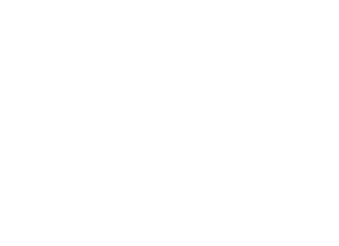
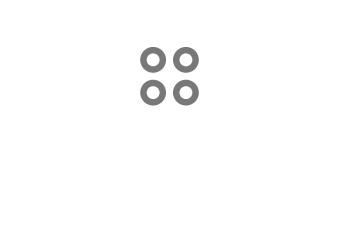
via: none -> (153, 59)
via: none -> (185, 59)
via: none -> (153, 92)
via: none -> (185, 92)

